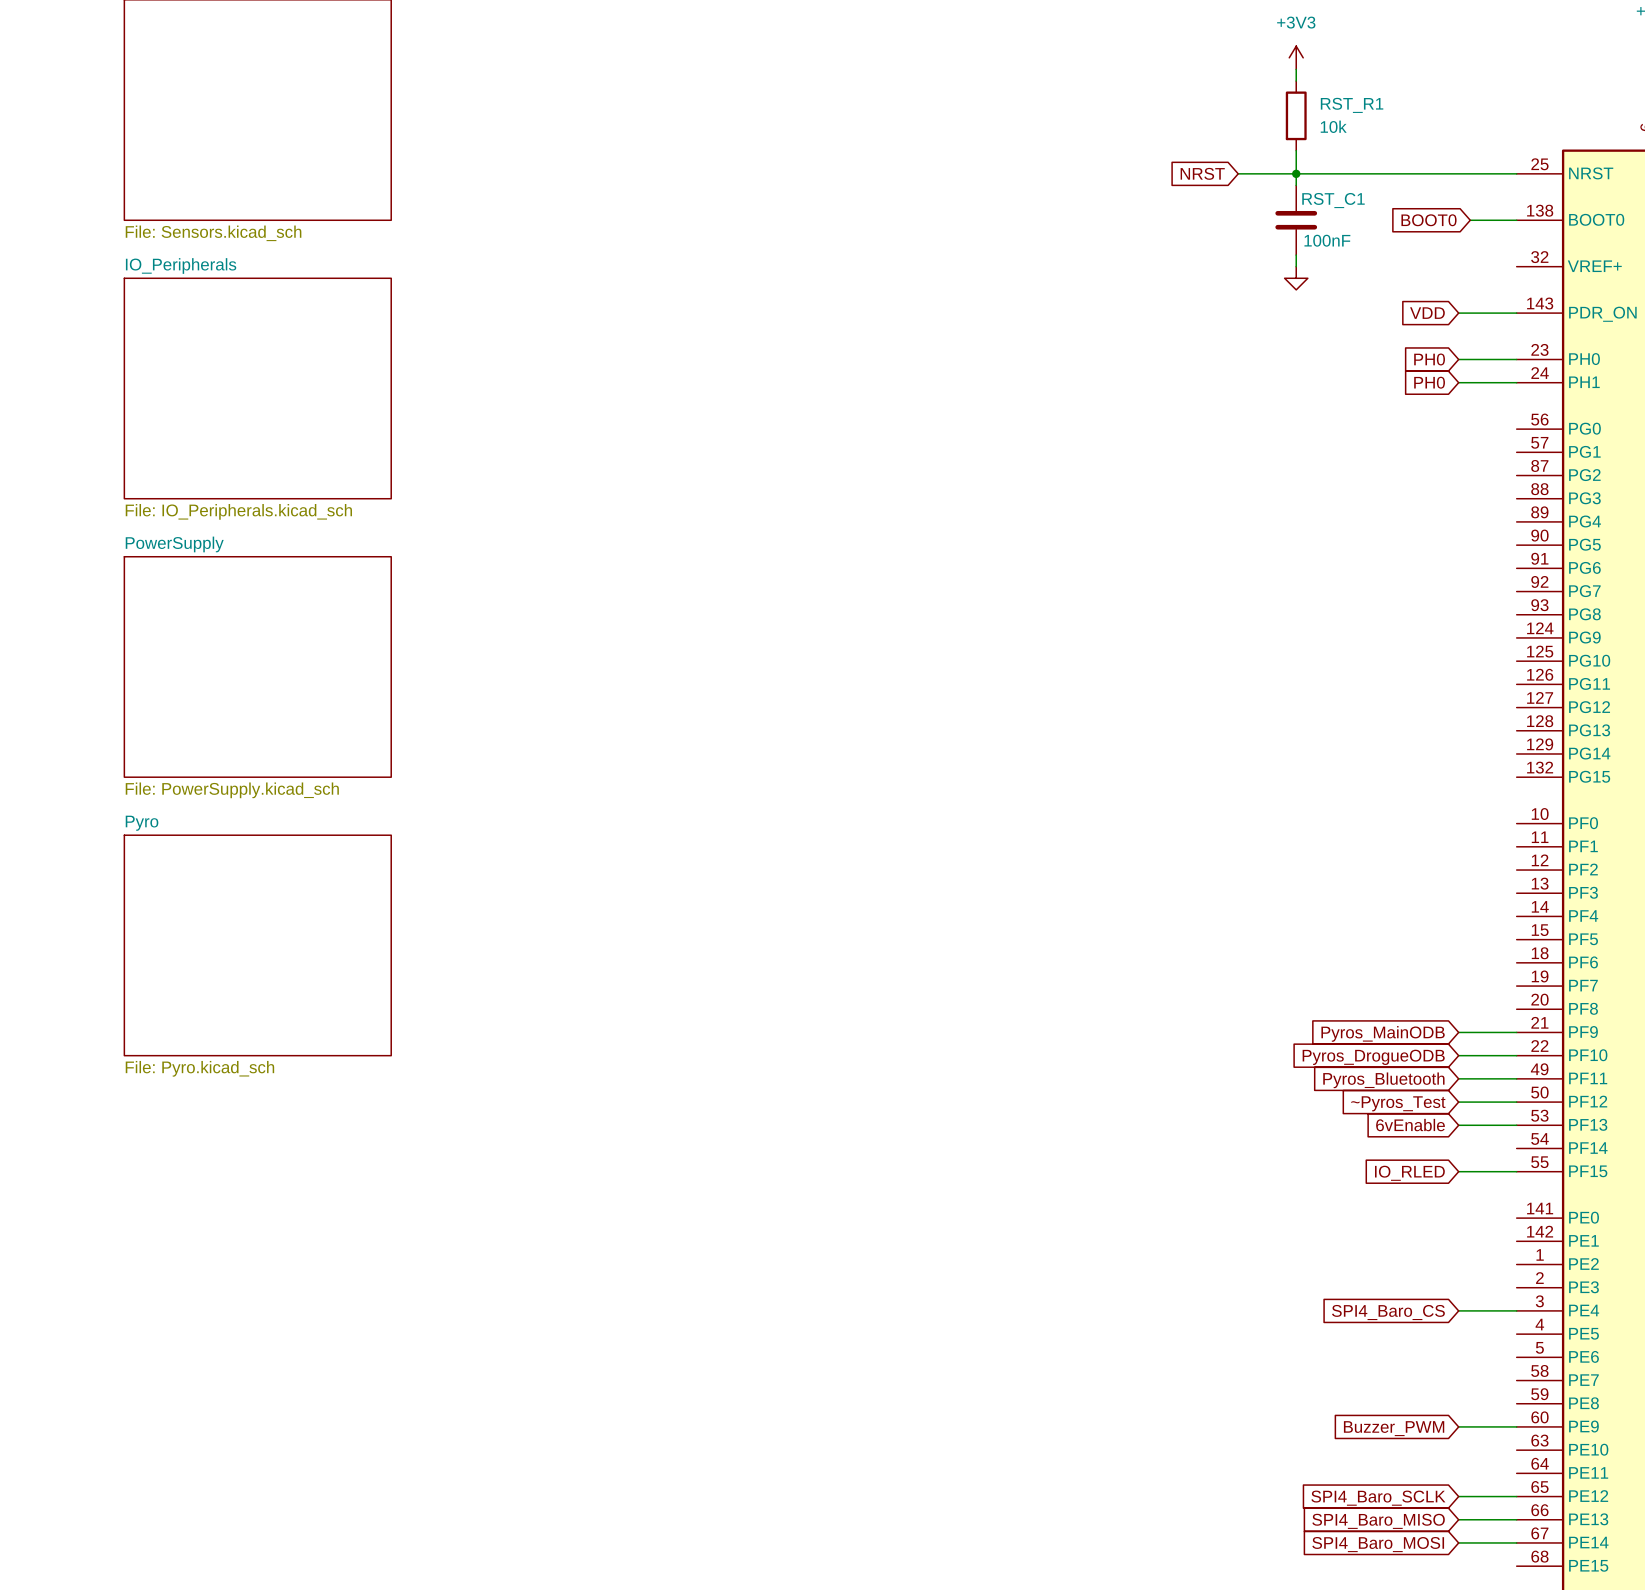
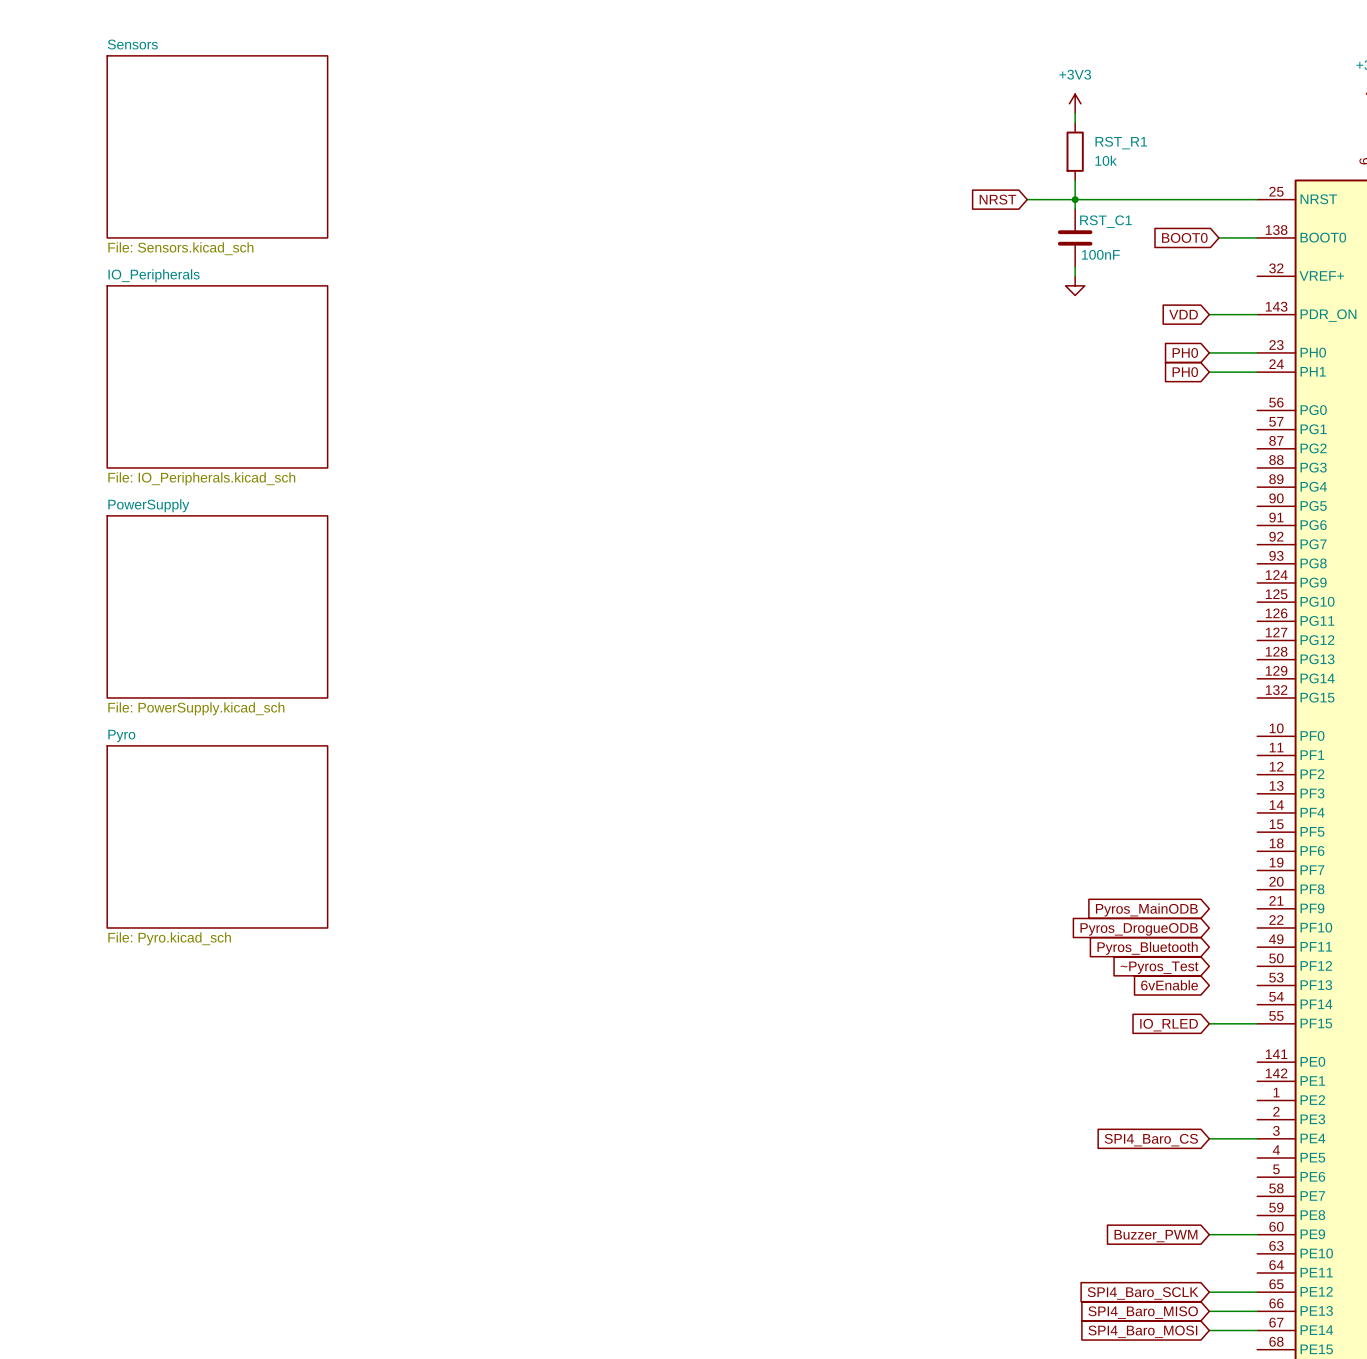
wire: (1458, 1032) (1516, 1032) -> none
wire: (1458, 1055) (1516, 1055) -> none
wire: (1458, 1078) (1516, 1078) -> none
wire: (1458, 1102) (1516, 1102) -> none
wire: (1458, 1125) (1516, 1125) -> none

